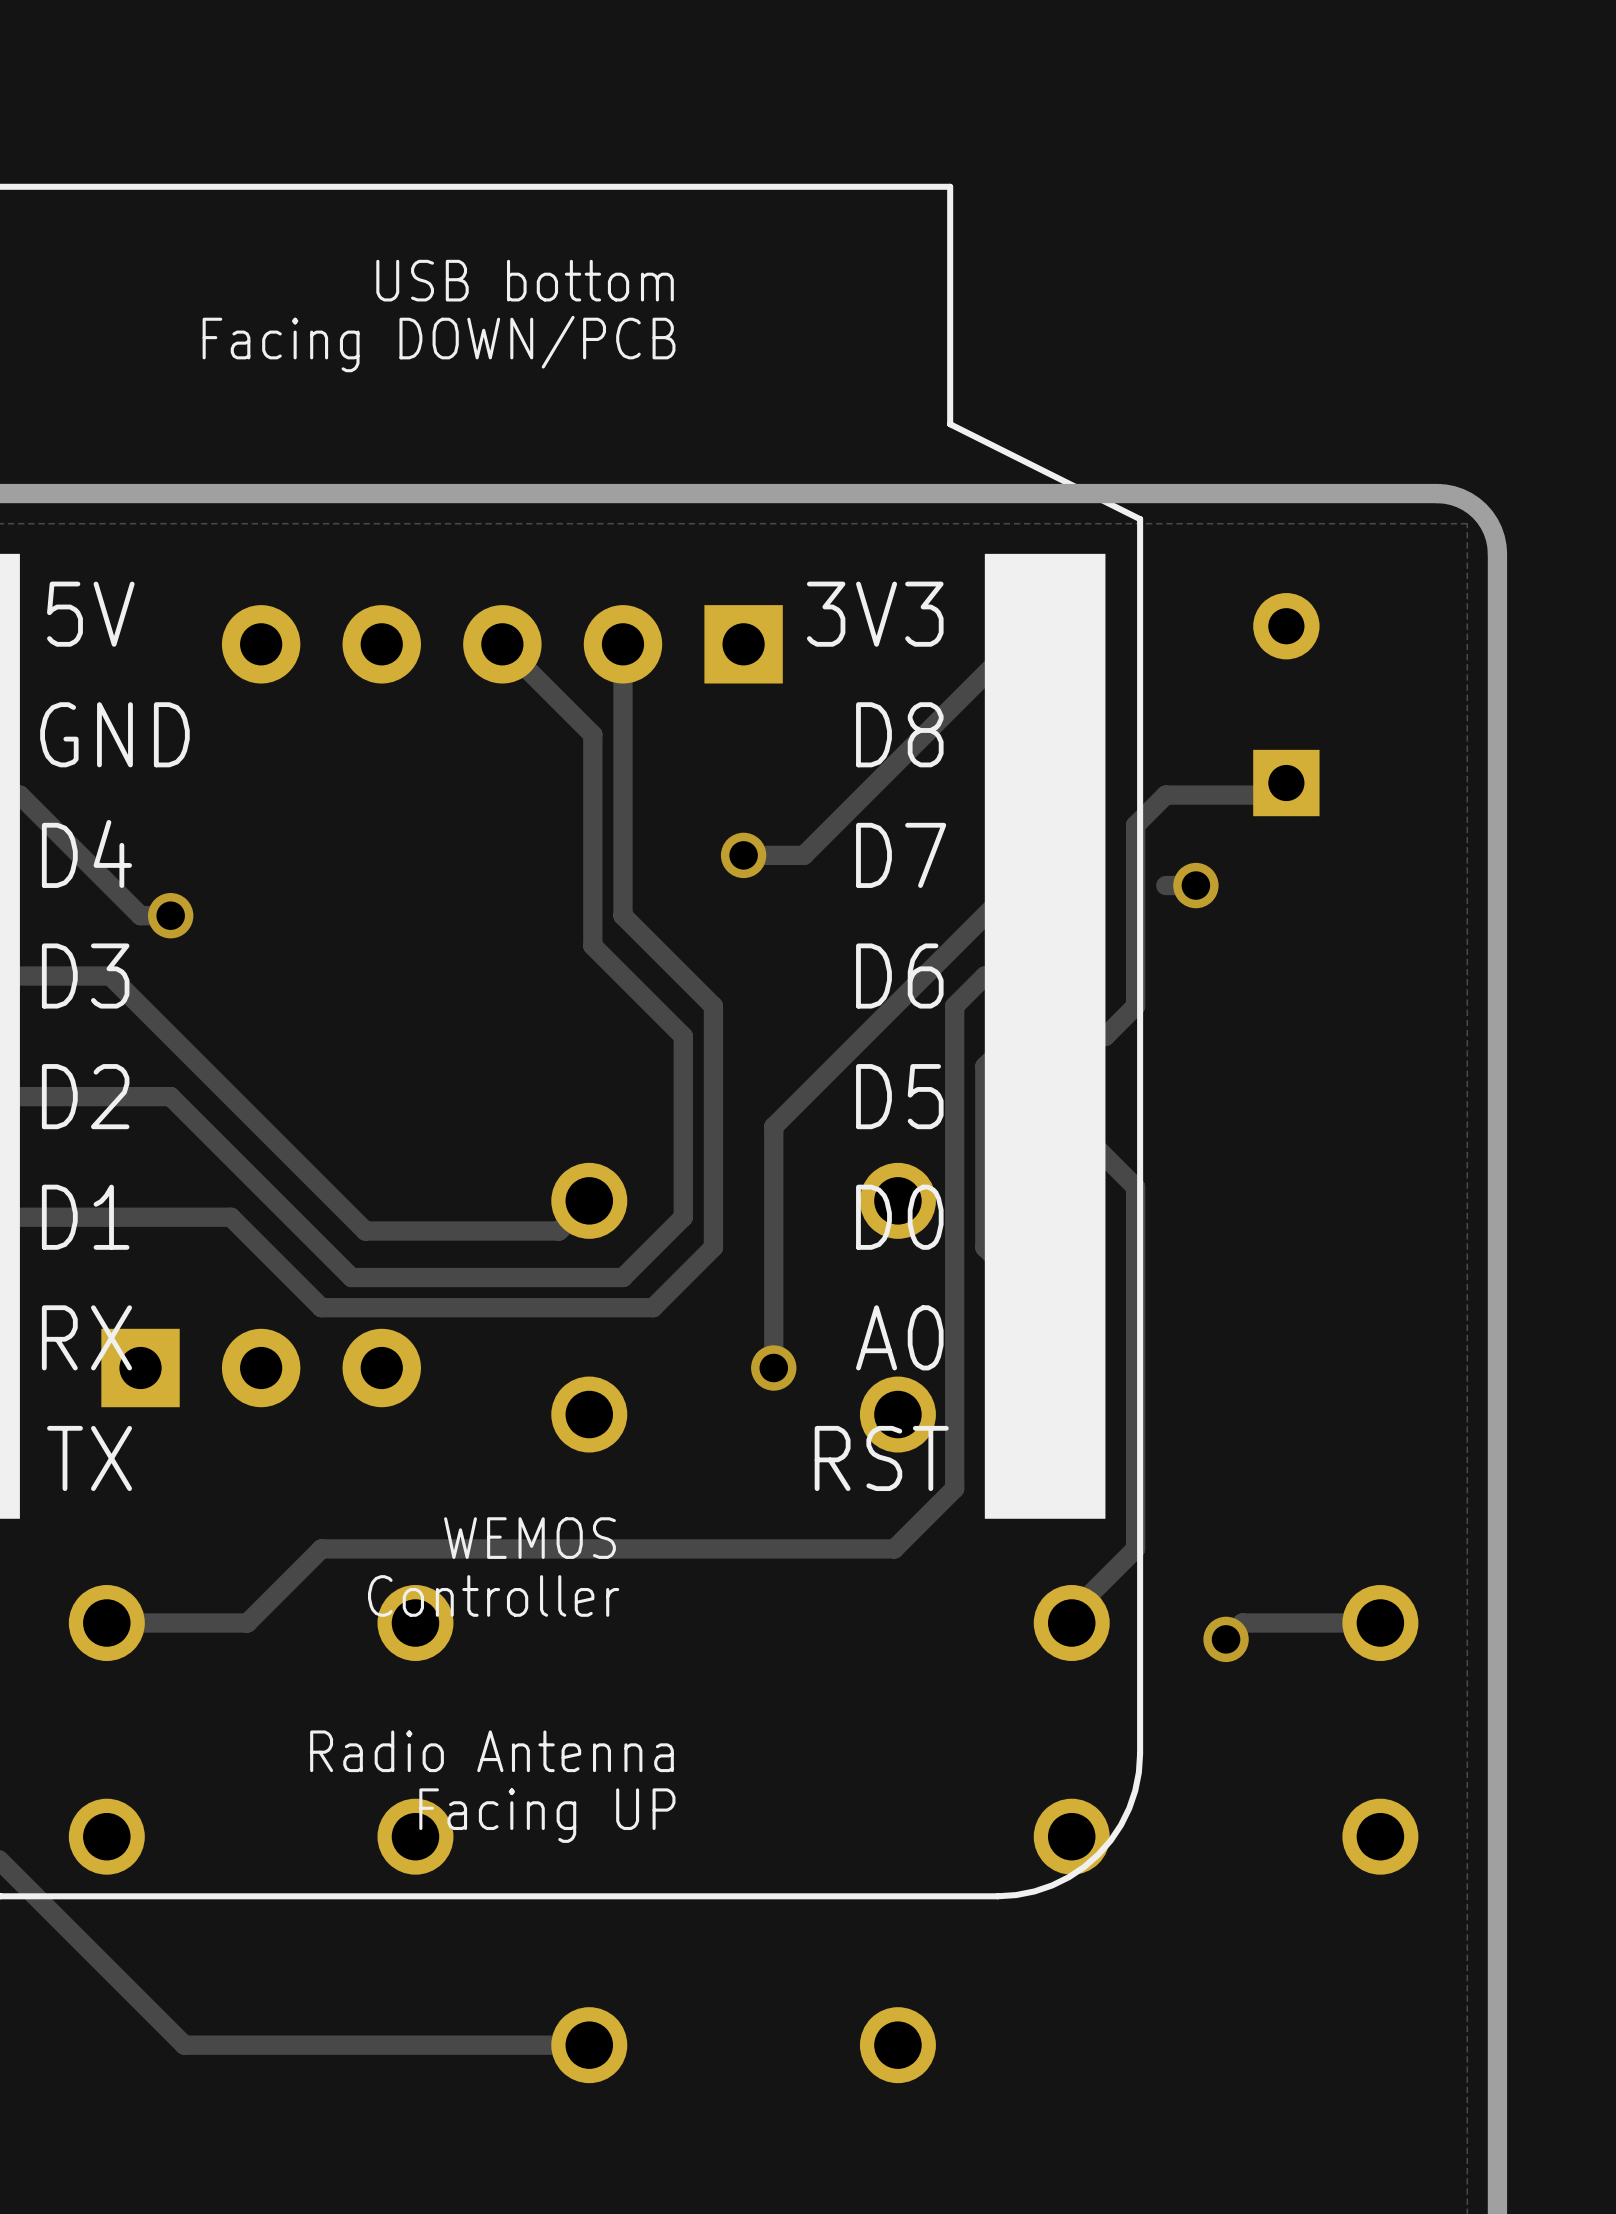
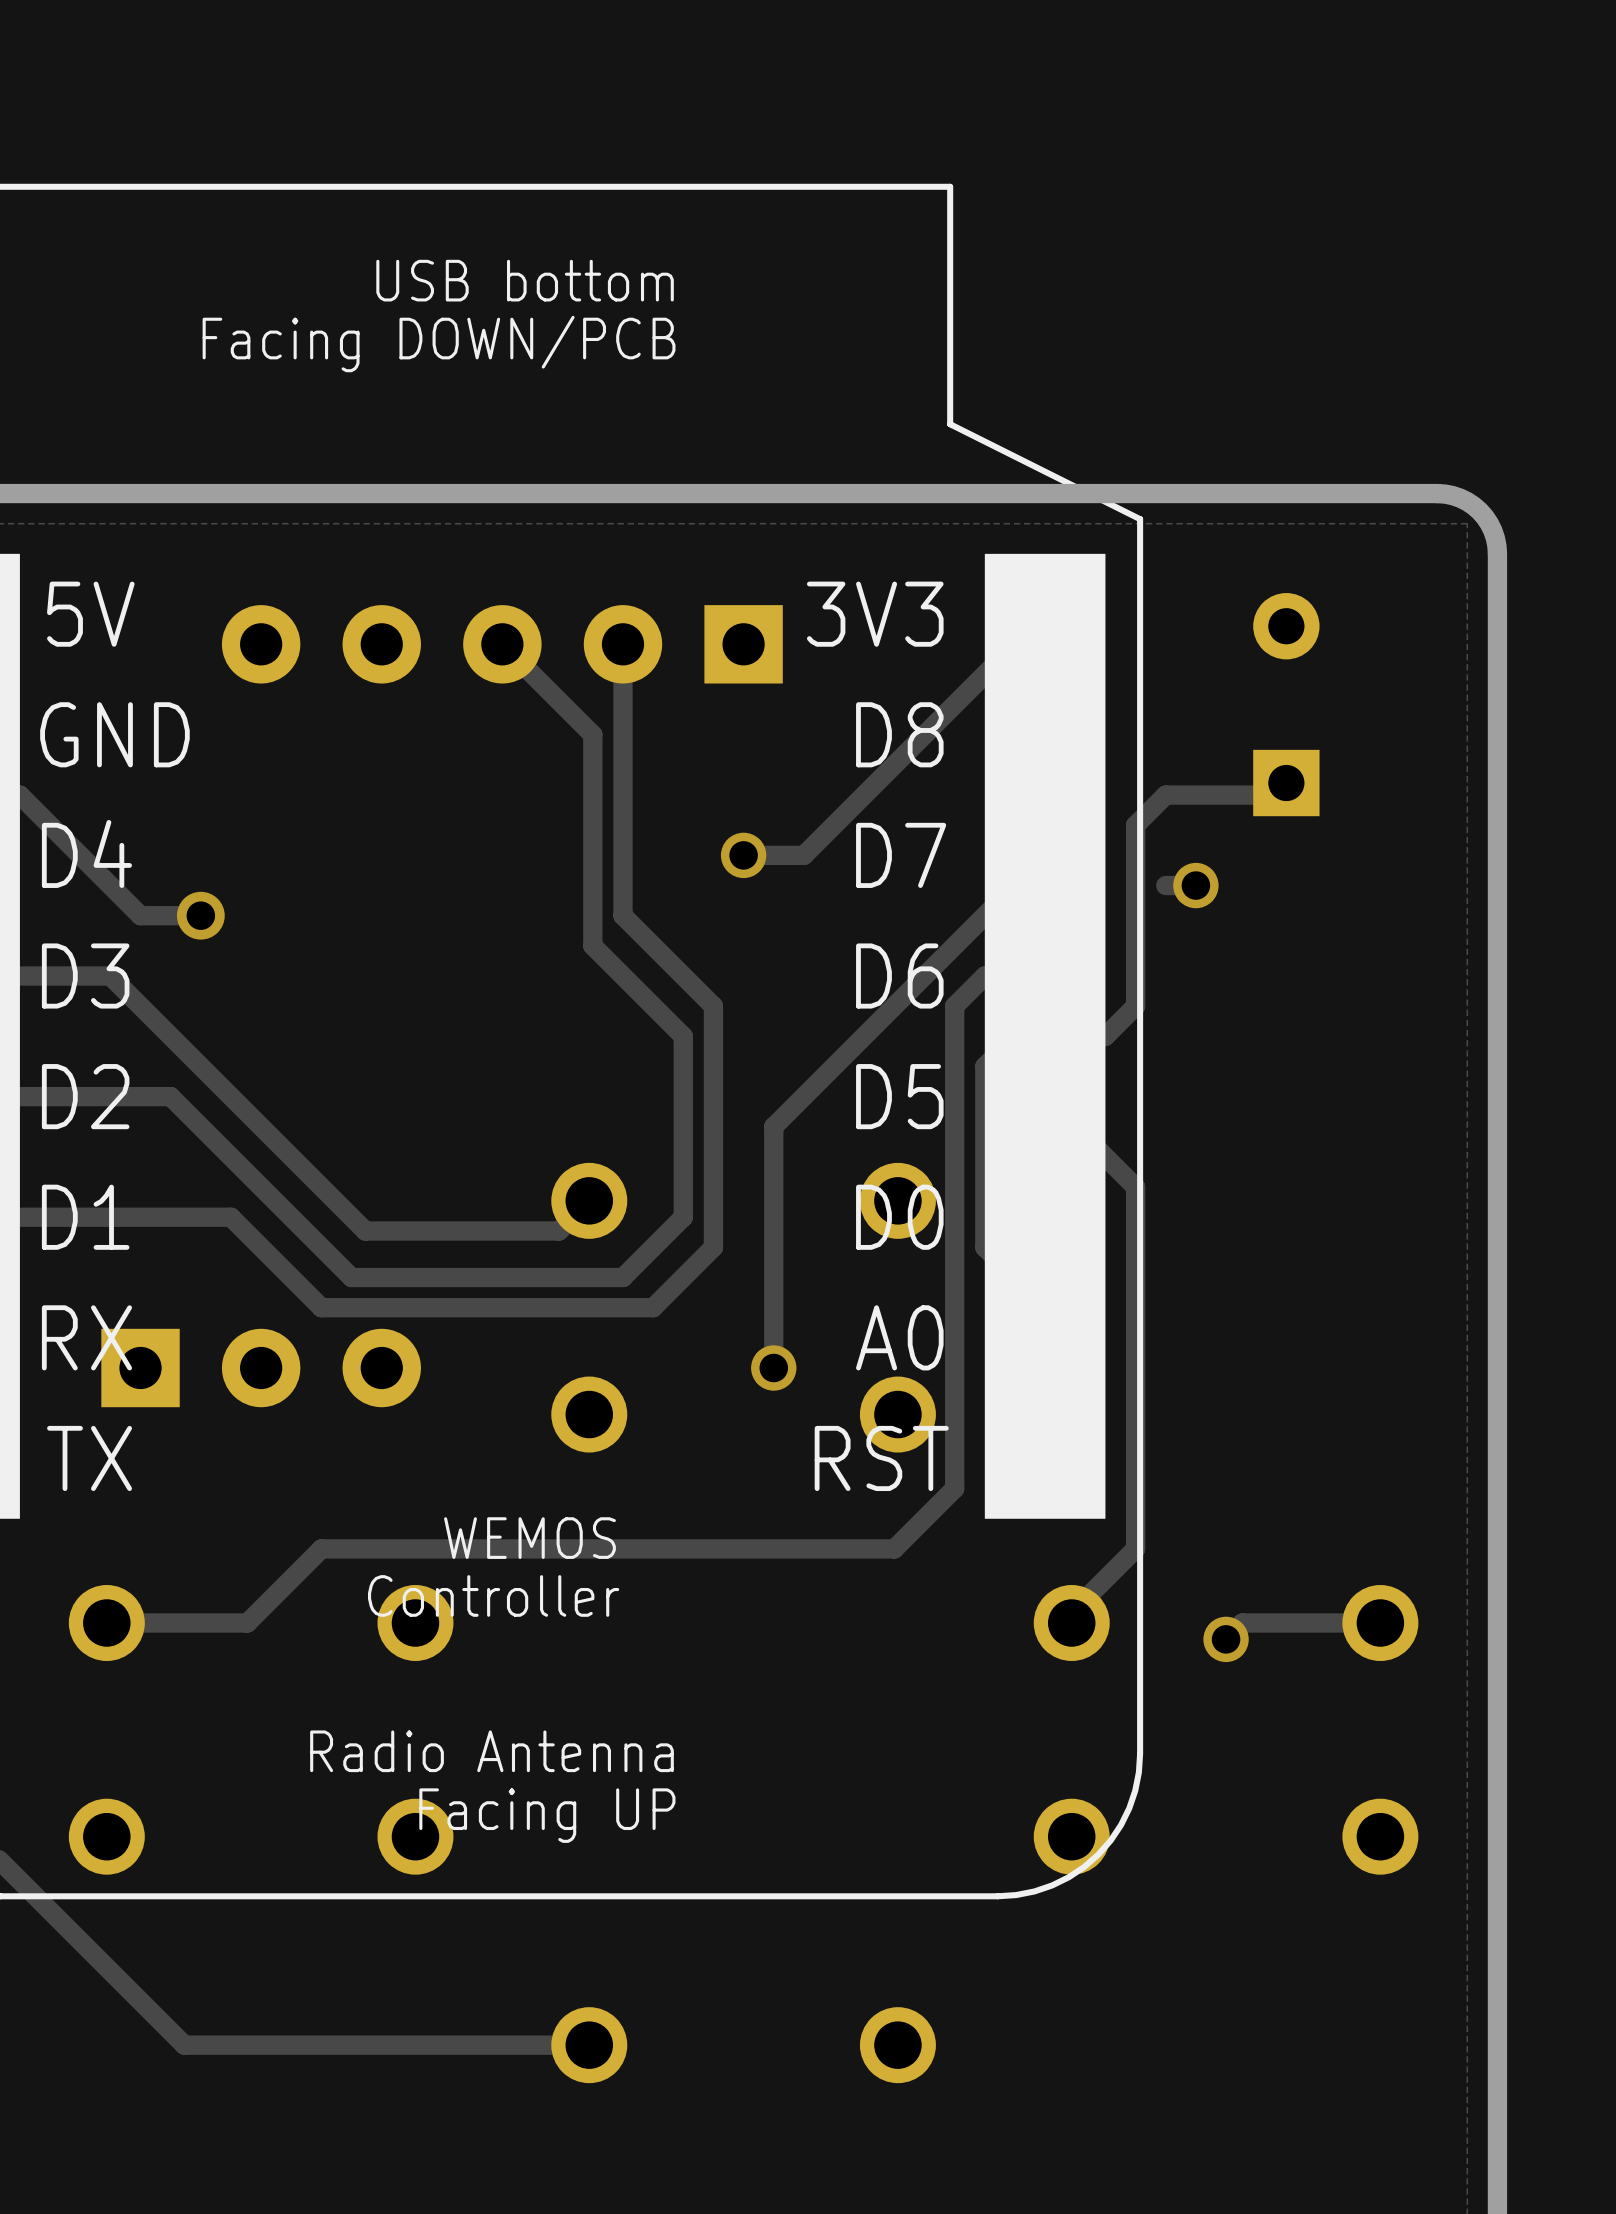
via position: (170, 915) -> (200, 915)

